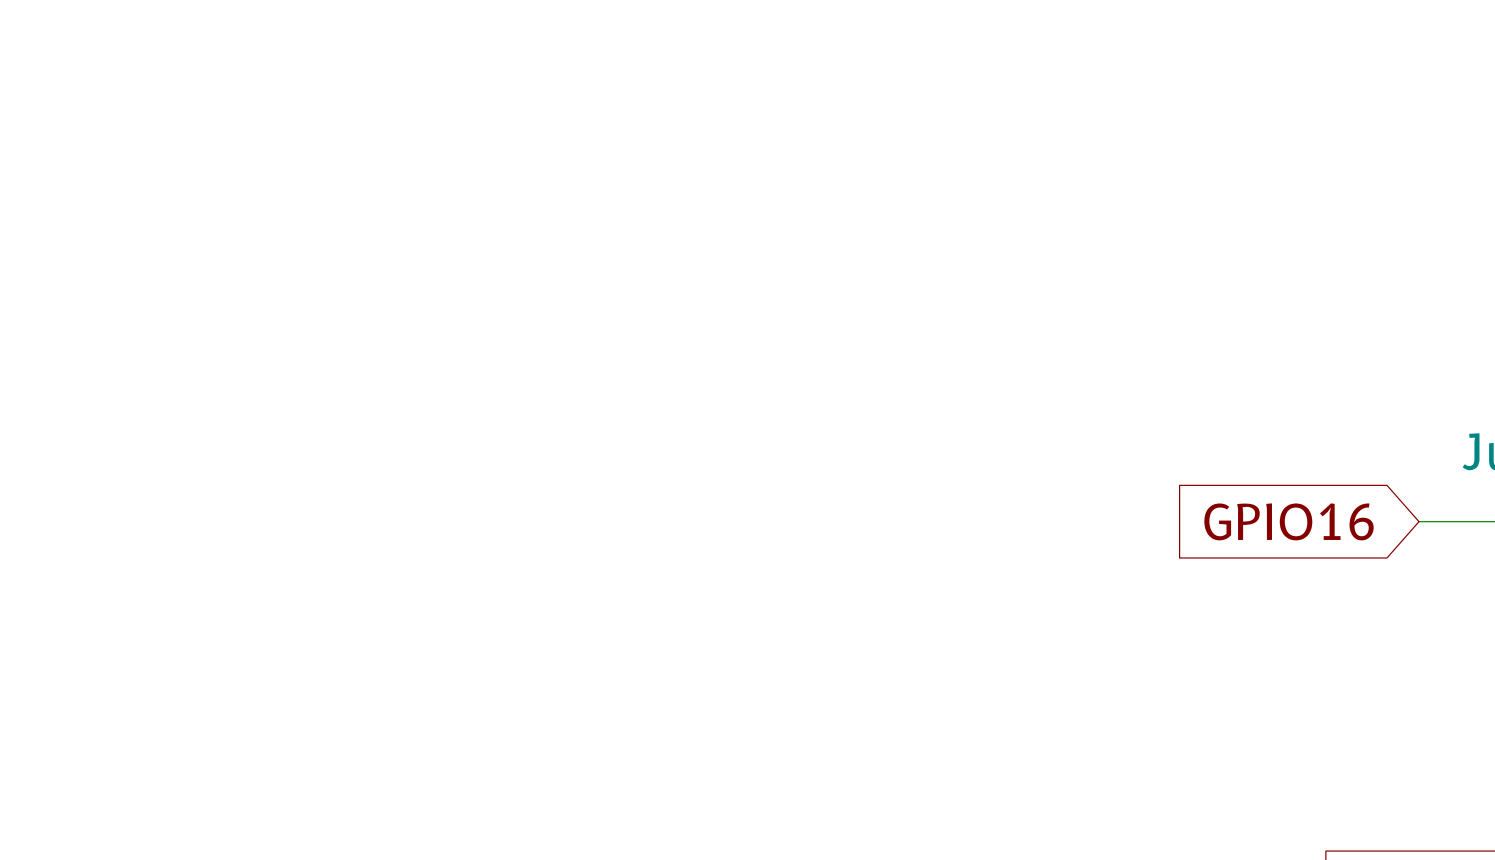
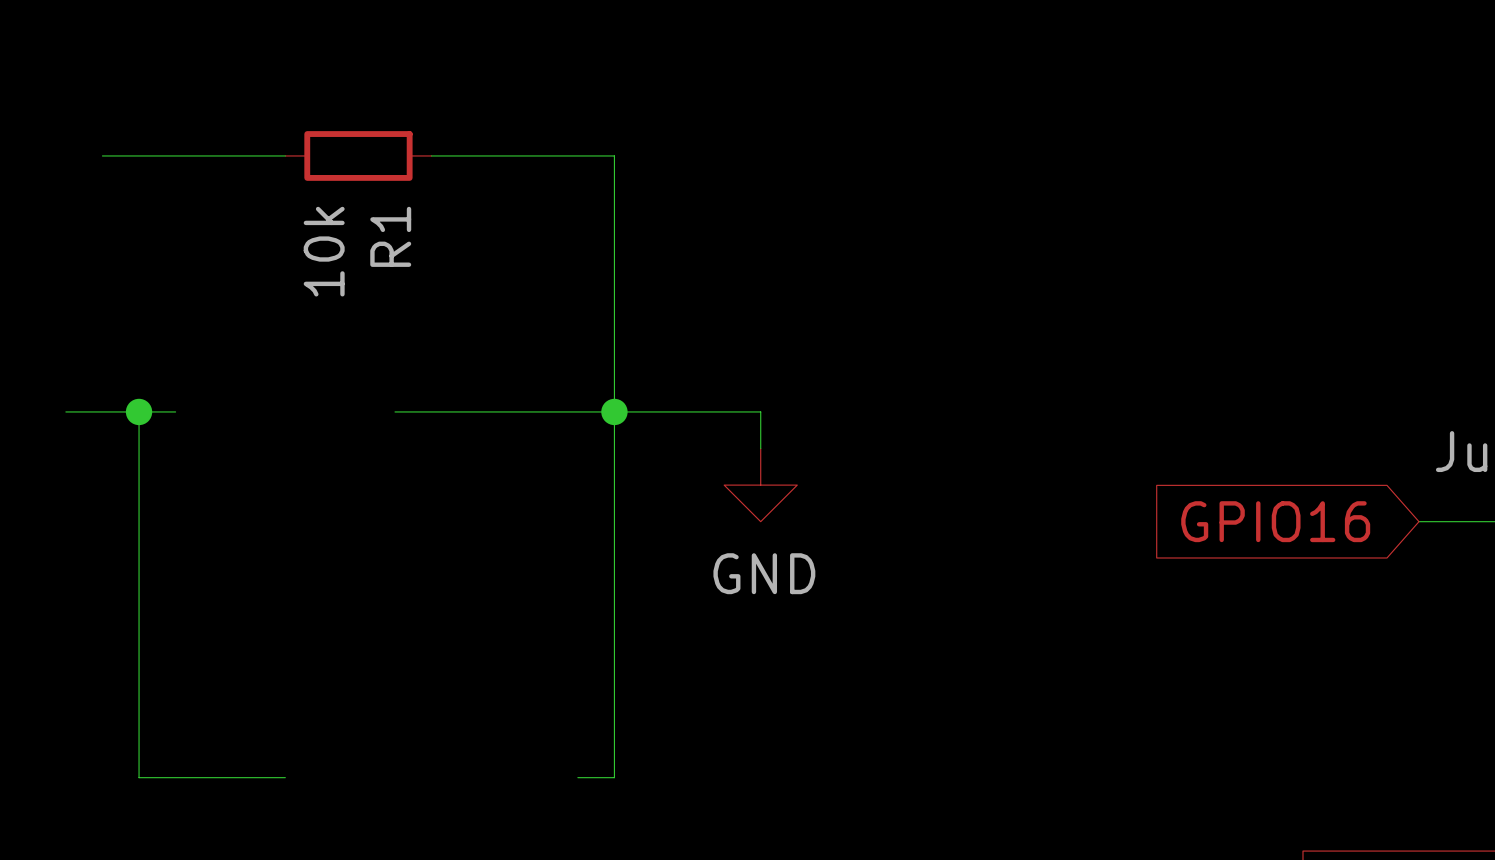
wire: none -> (102, 155) (285, 155)
R1: none -> 10k (358, 155)
wire: none -> (431, 155) (614, 155) (614, 777) (577, 777)
wire: none -> (65, 411) (175, 411)
wire: none -> (139, 411) (139, 777) (285, 777)
junction: none -> (139, 411)
wire: none -> (395, 411) (760, 411) (760, 448)
junction: none -> (614, 411)
power symbol: none -> GND (760, 485)

